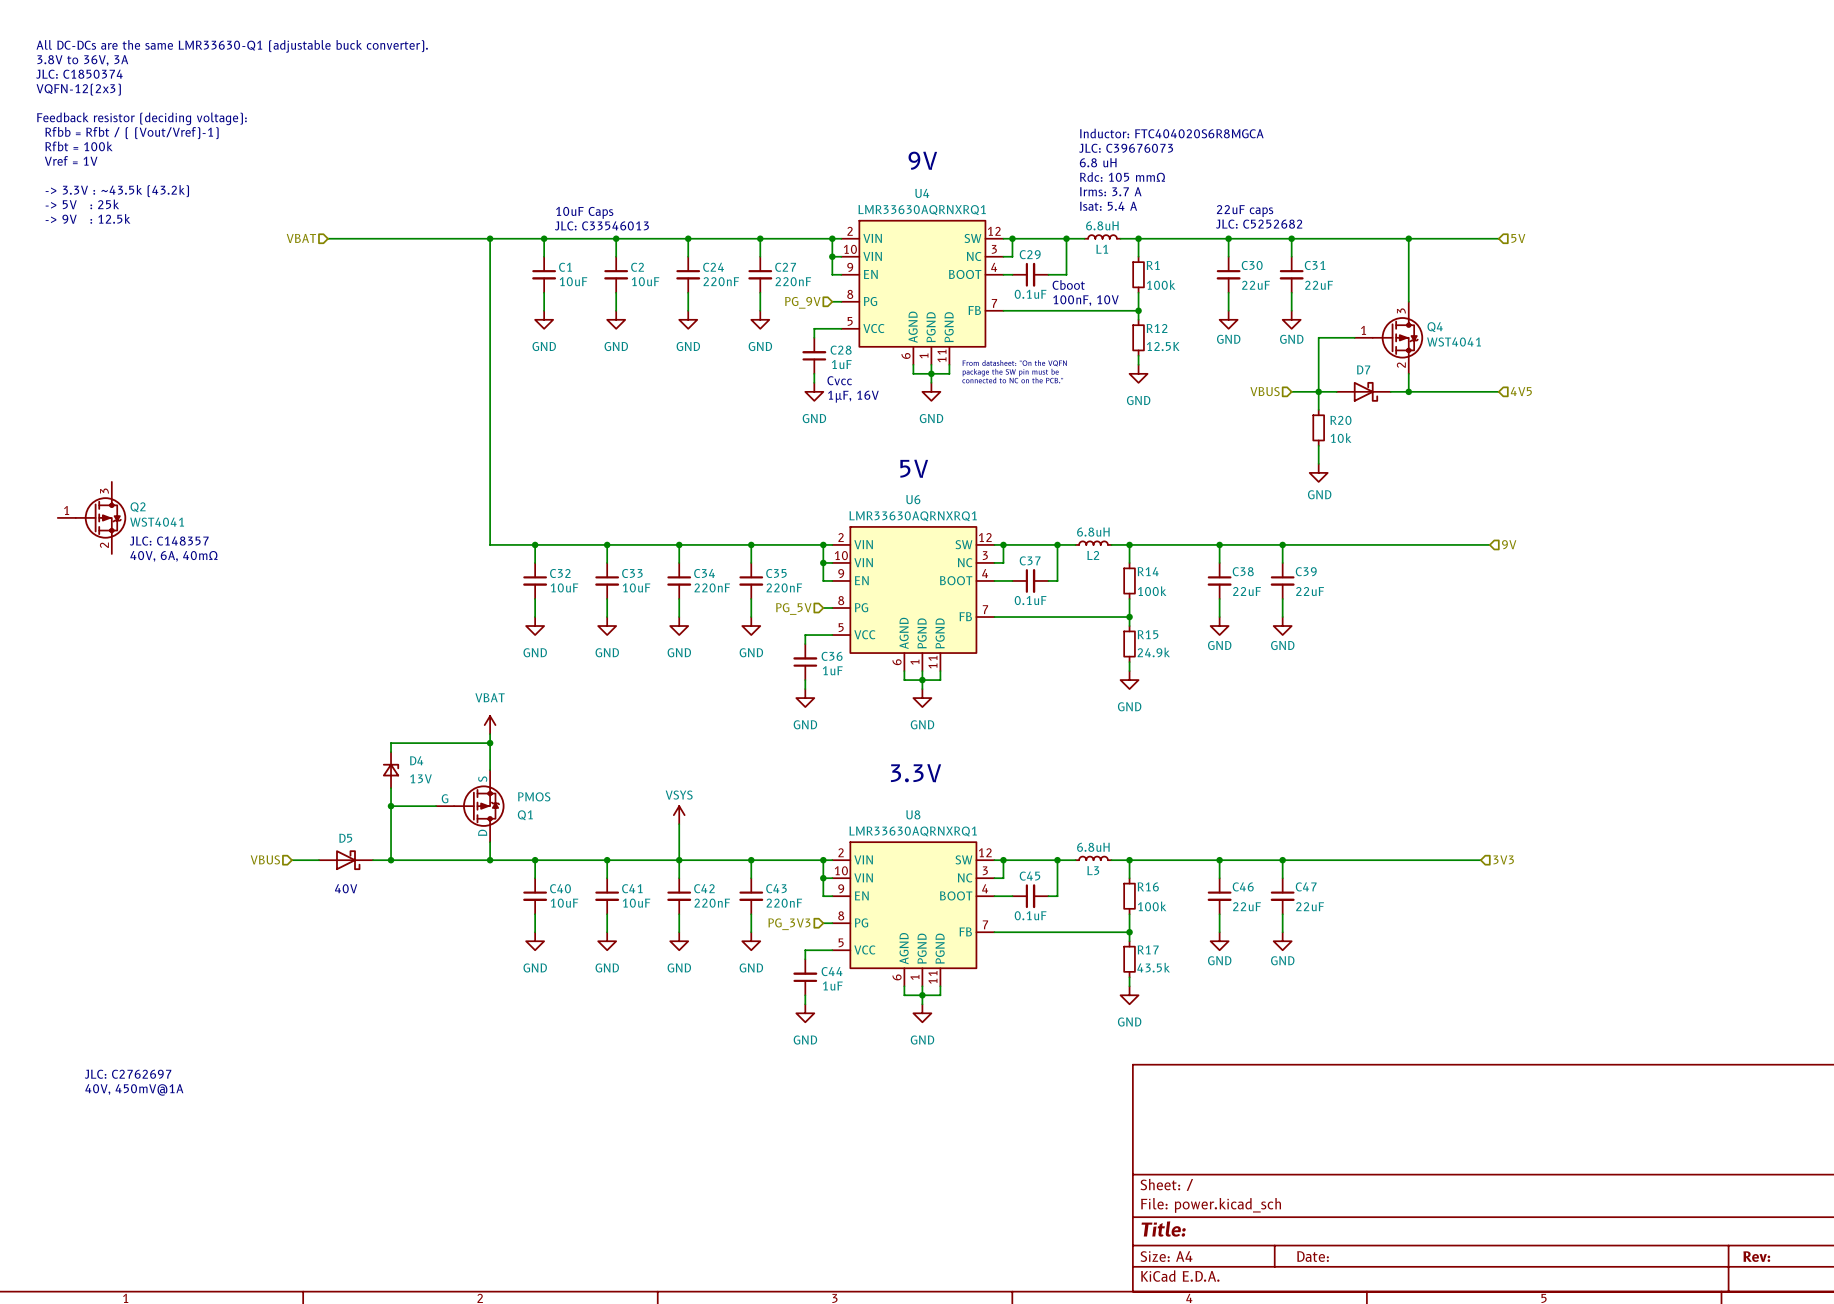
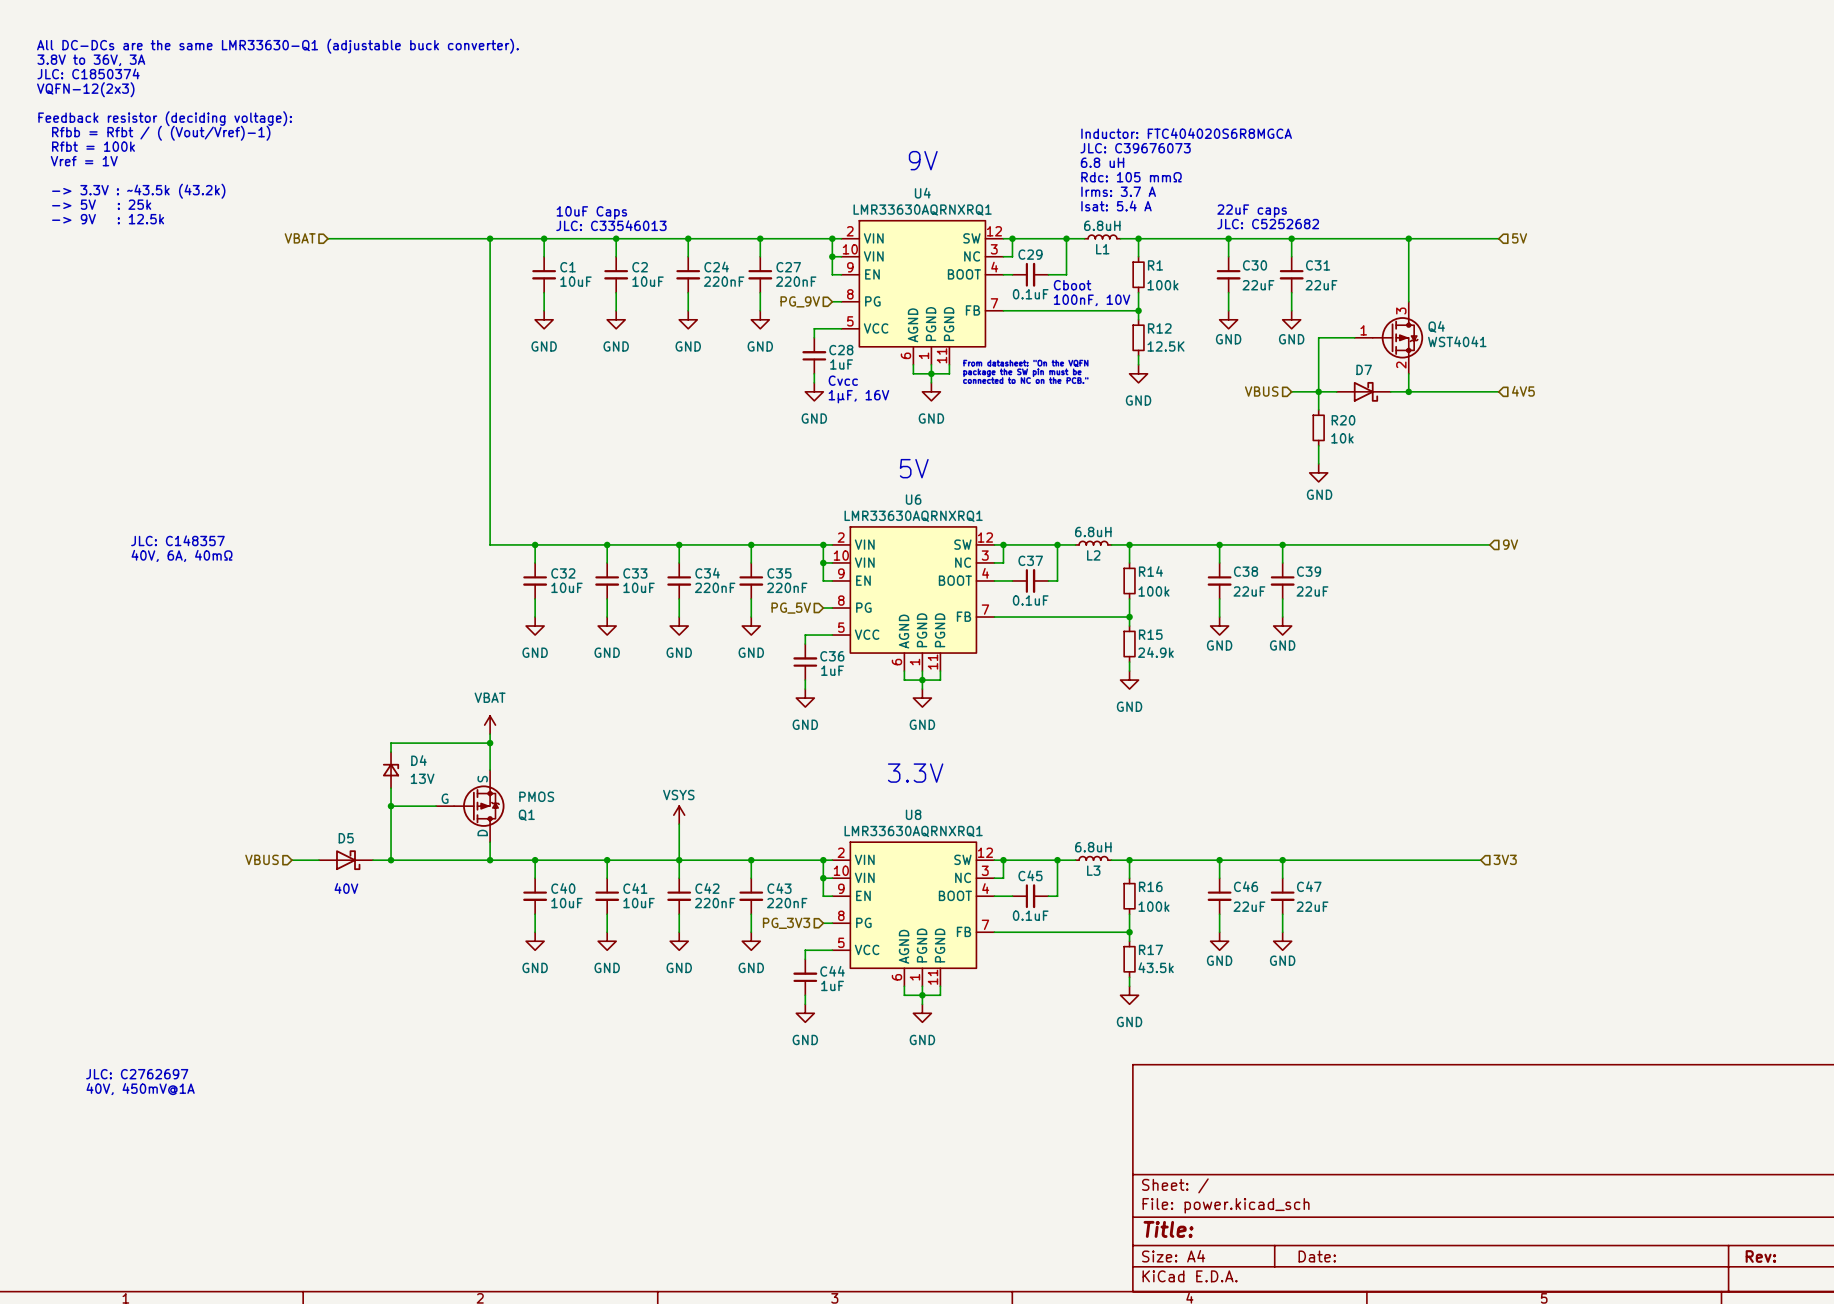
Q2: WST4041 (92, 517) -> none

